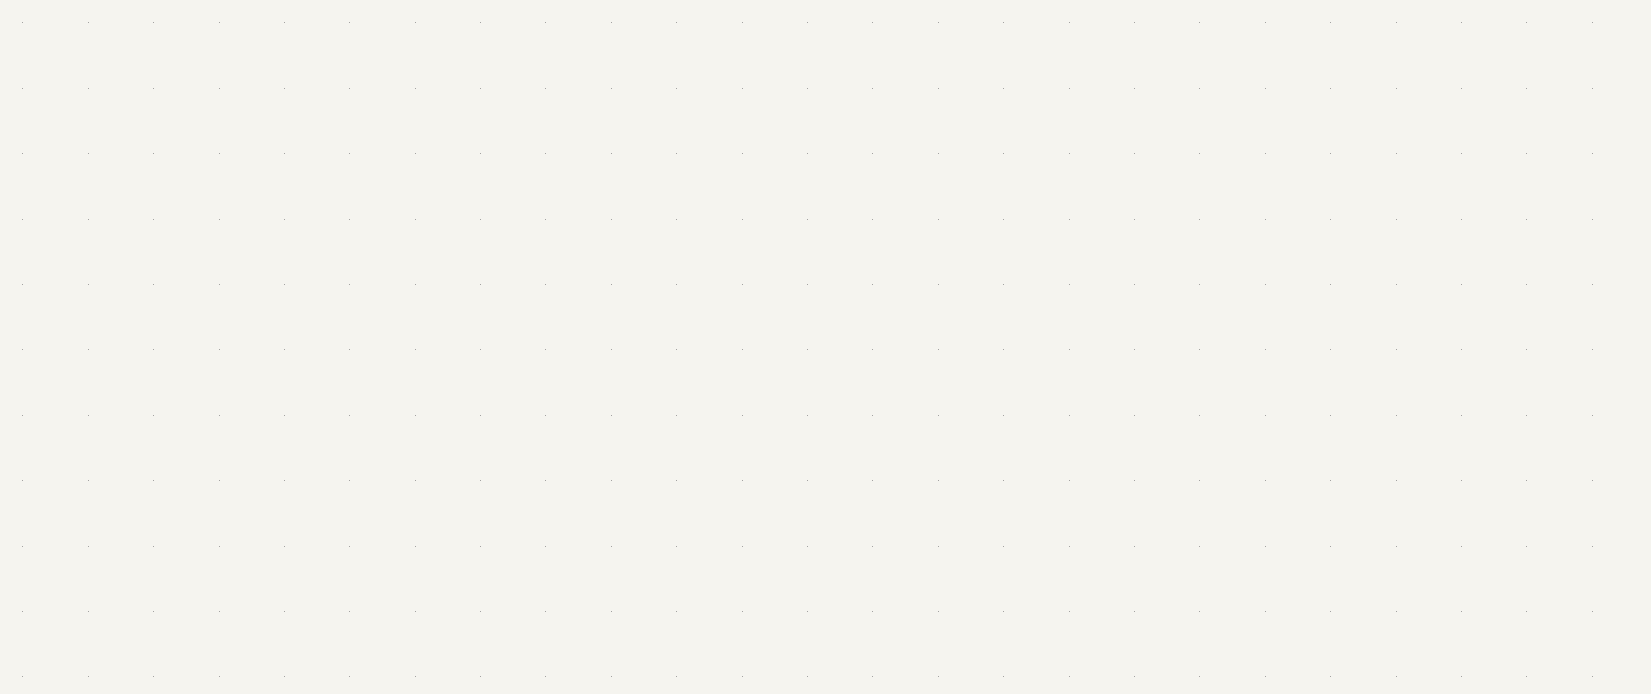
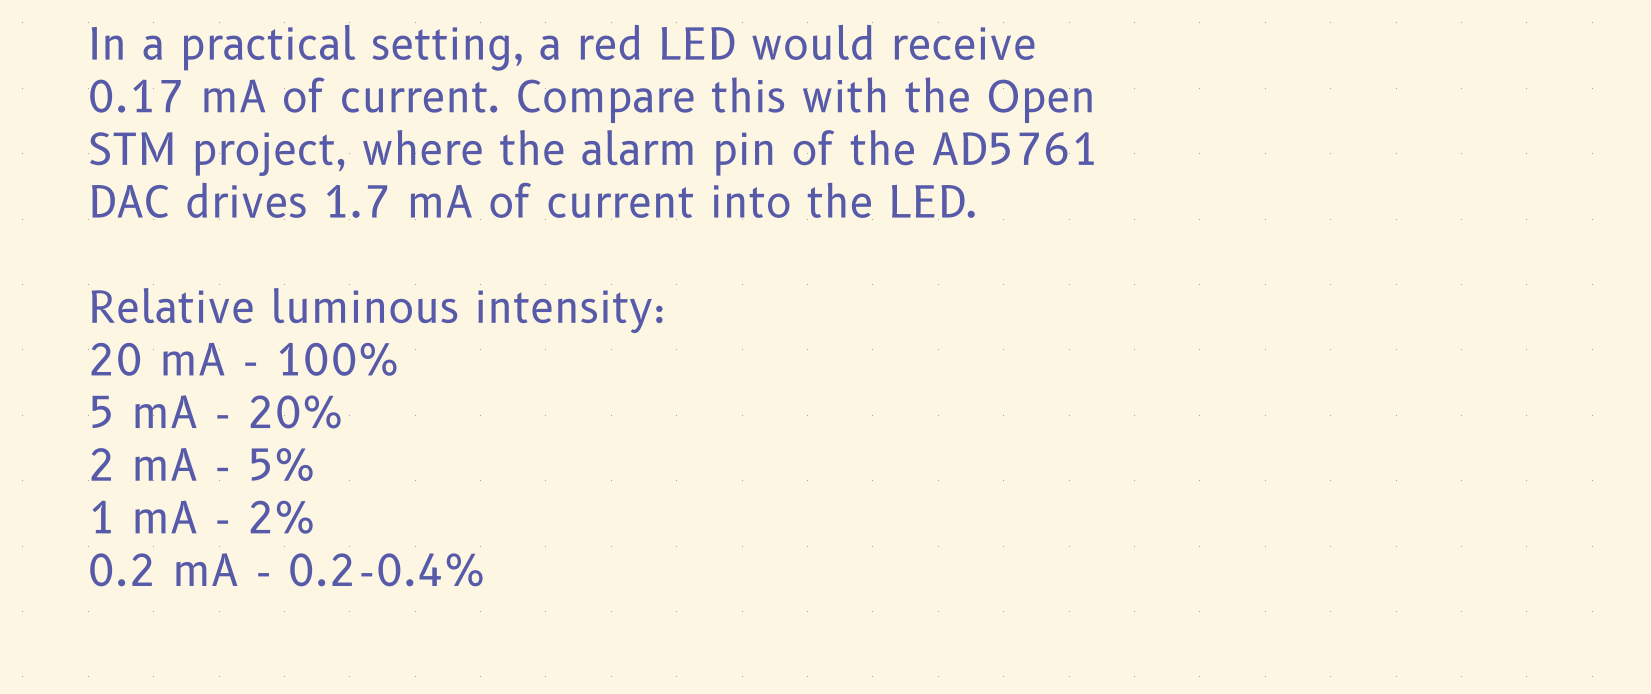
text: none -> In a practical setting, a red LED would receive (563, 47)
text: none -> 0.17 mA of current. Compare this with the Open (590, 100)
text: none -> STM project, where the alarm pin of the AD5761 (591, 153)
text: none -> DAC drives 1.7 mA of current into the LED. (533, 200)
text: none -> Relative luminous intensity: (377, 310)
text: none -> 20 mA - 100% (244, 359)
text: none -> 5 mA - 20% (216, 411)
text: none -> 2 mA - 5% (202, 464)
text: none -> 1 mA - 2% (202, 517)
text: none -> 0.2 mA - 0.2-0.4% (286, 569)

